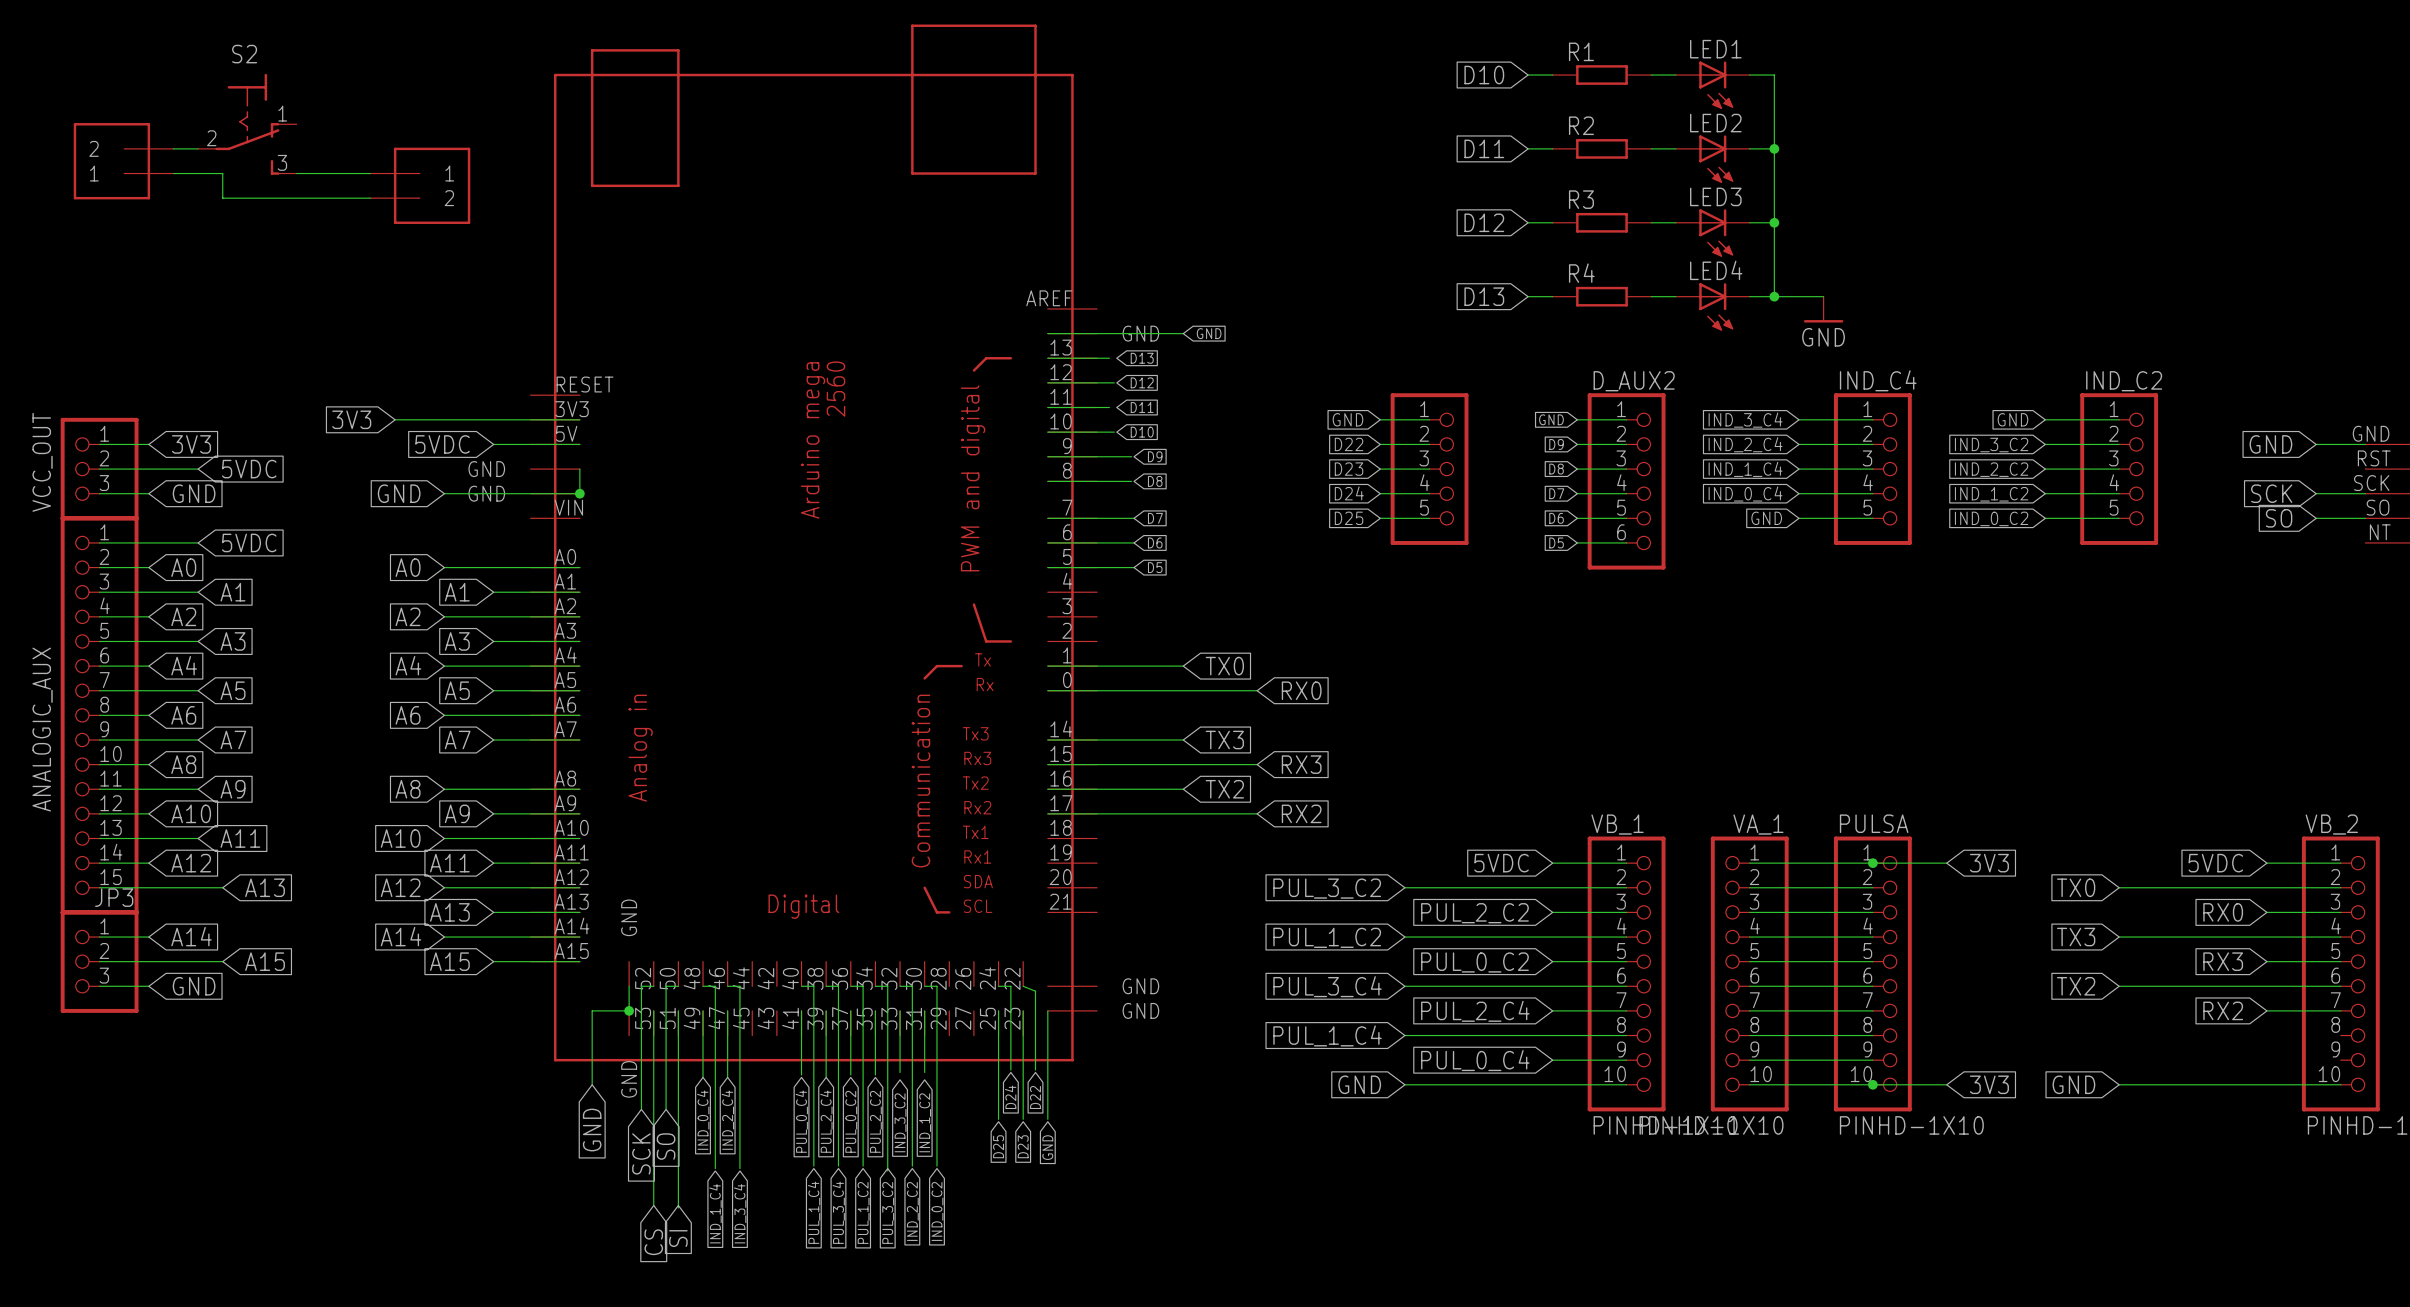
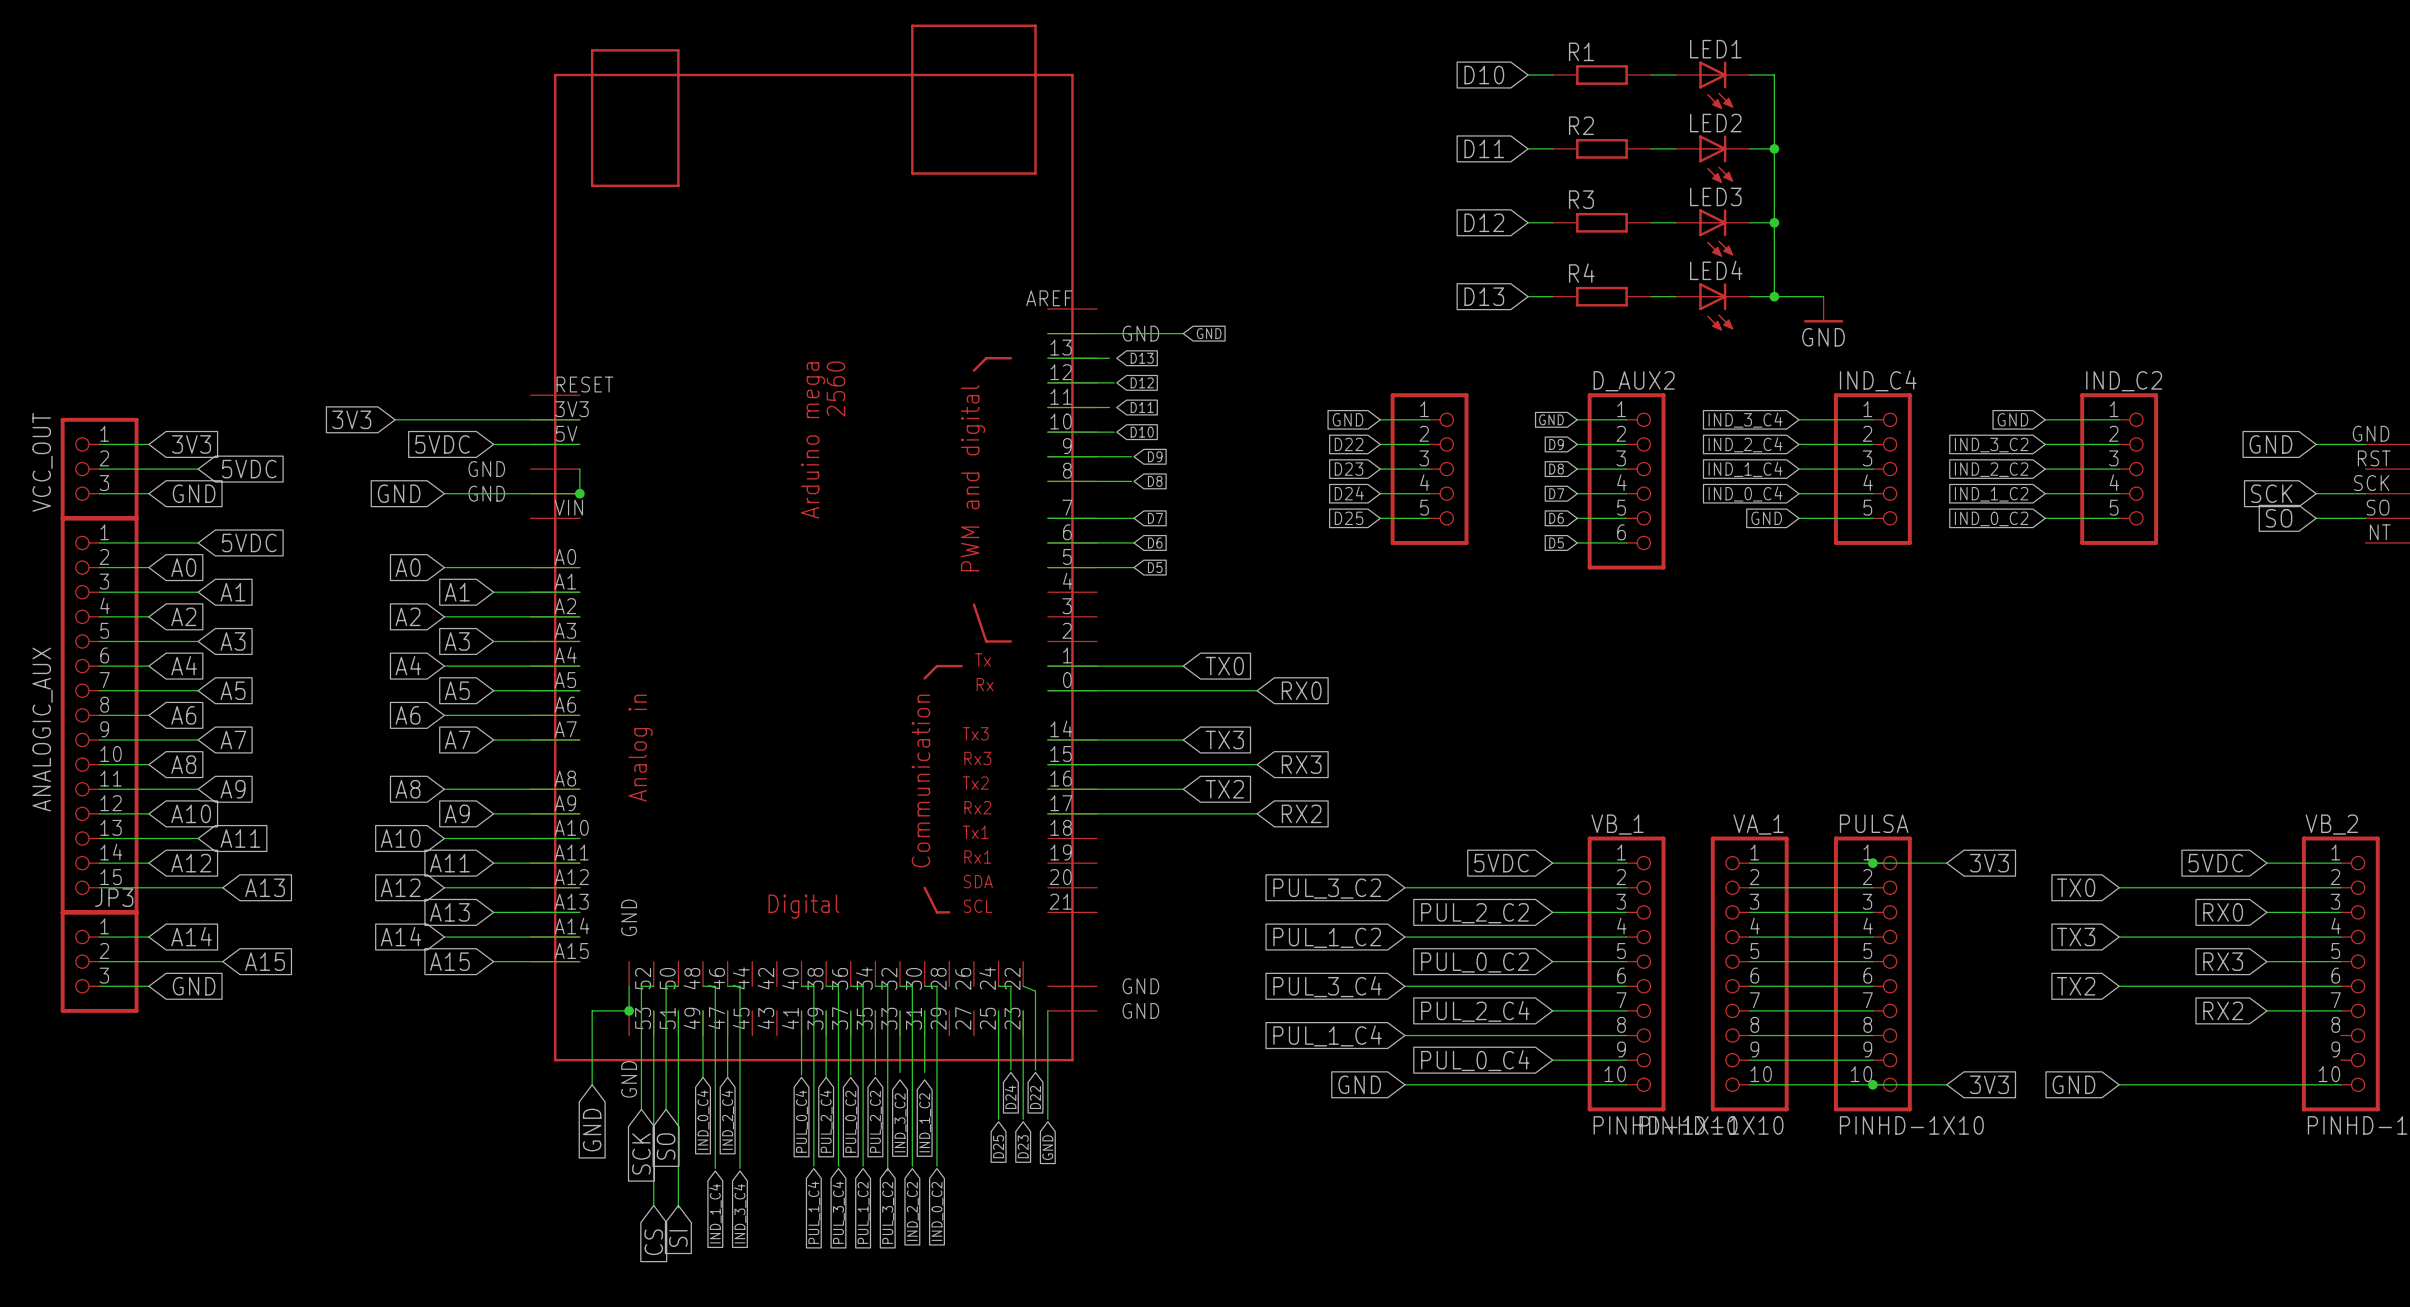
S2: (247, 124) -> none
wire: (173, 148) (198, 148) -> none
part: (123, 161) -> none
wire: (173, 173) (222, 173) (222, 198) (370, 198) -> none
wire: (296, 173) (370, 173) -> none
part: (420, 185) -> none

